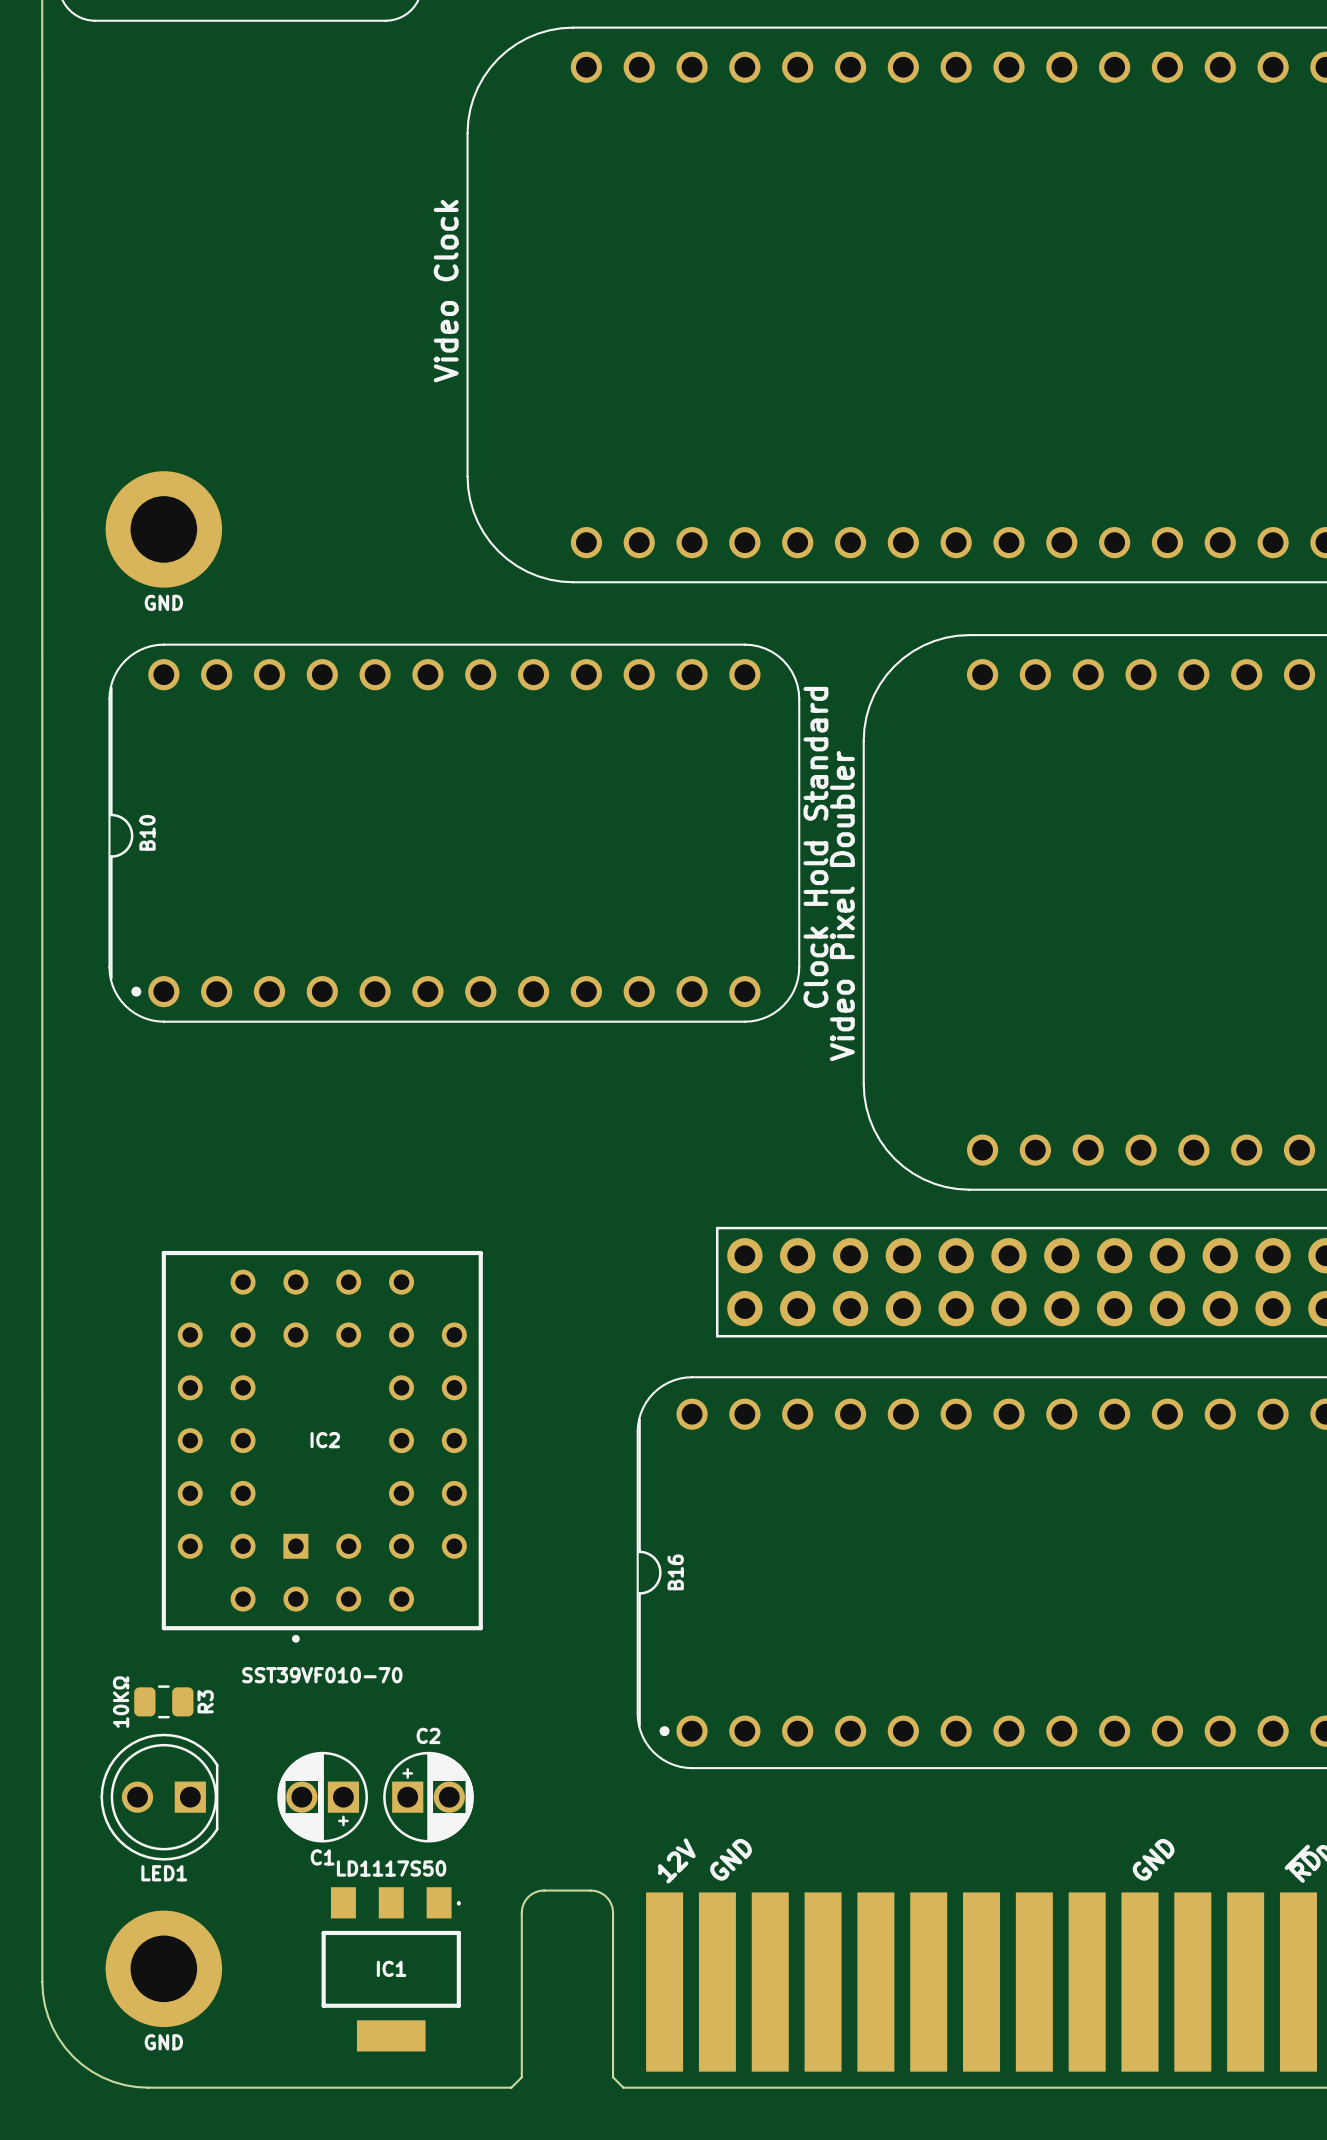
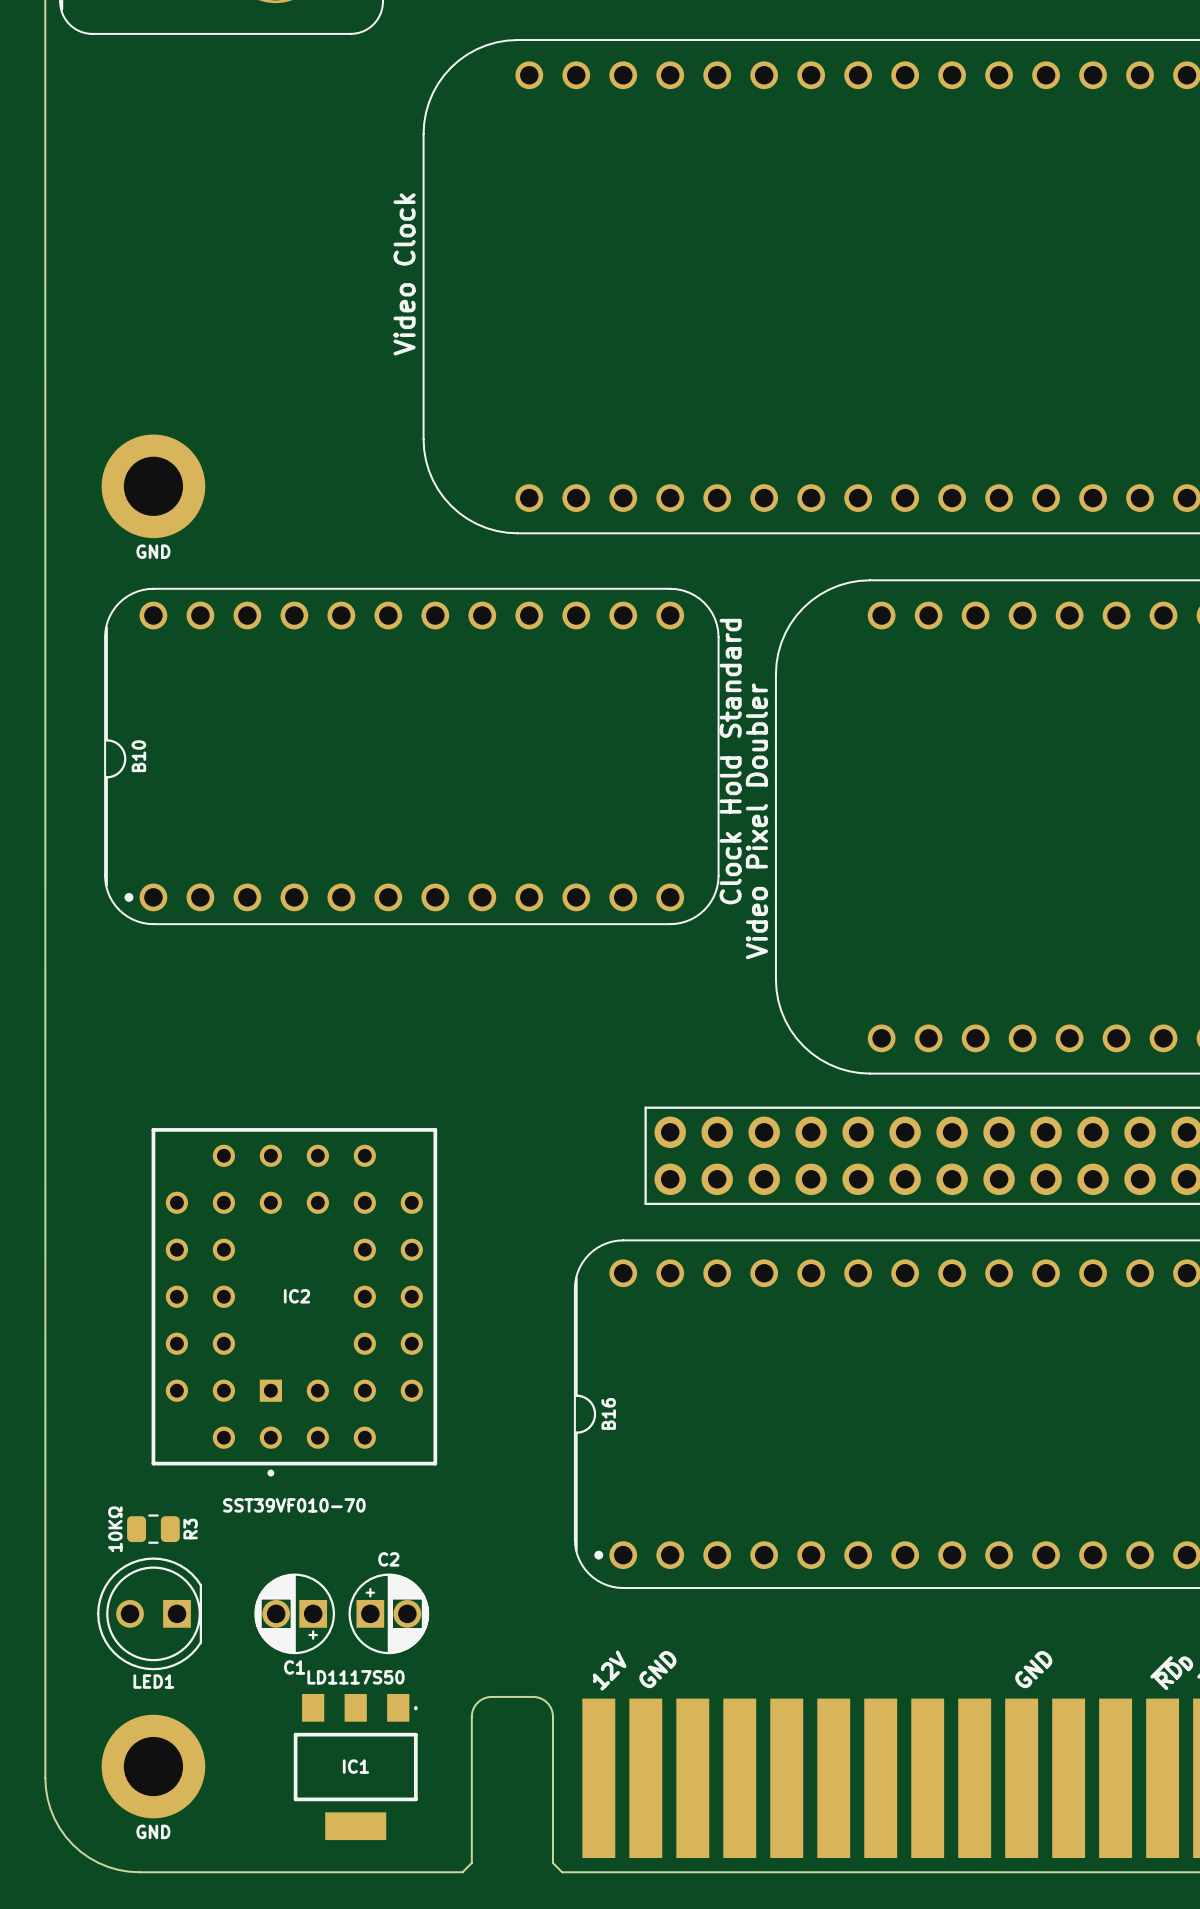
B10 text: none -> Clock Hold Standard (730, 761)
B10 text: Clock Hold Standard (815, 847) -> none

